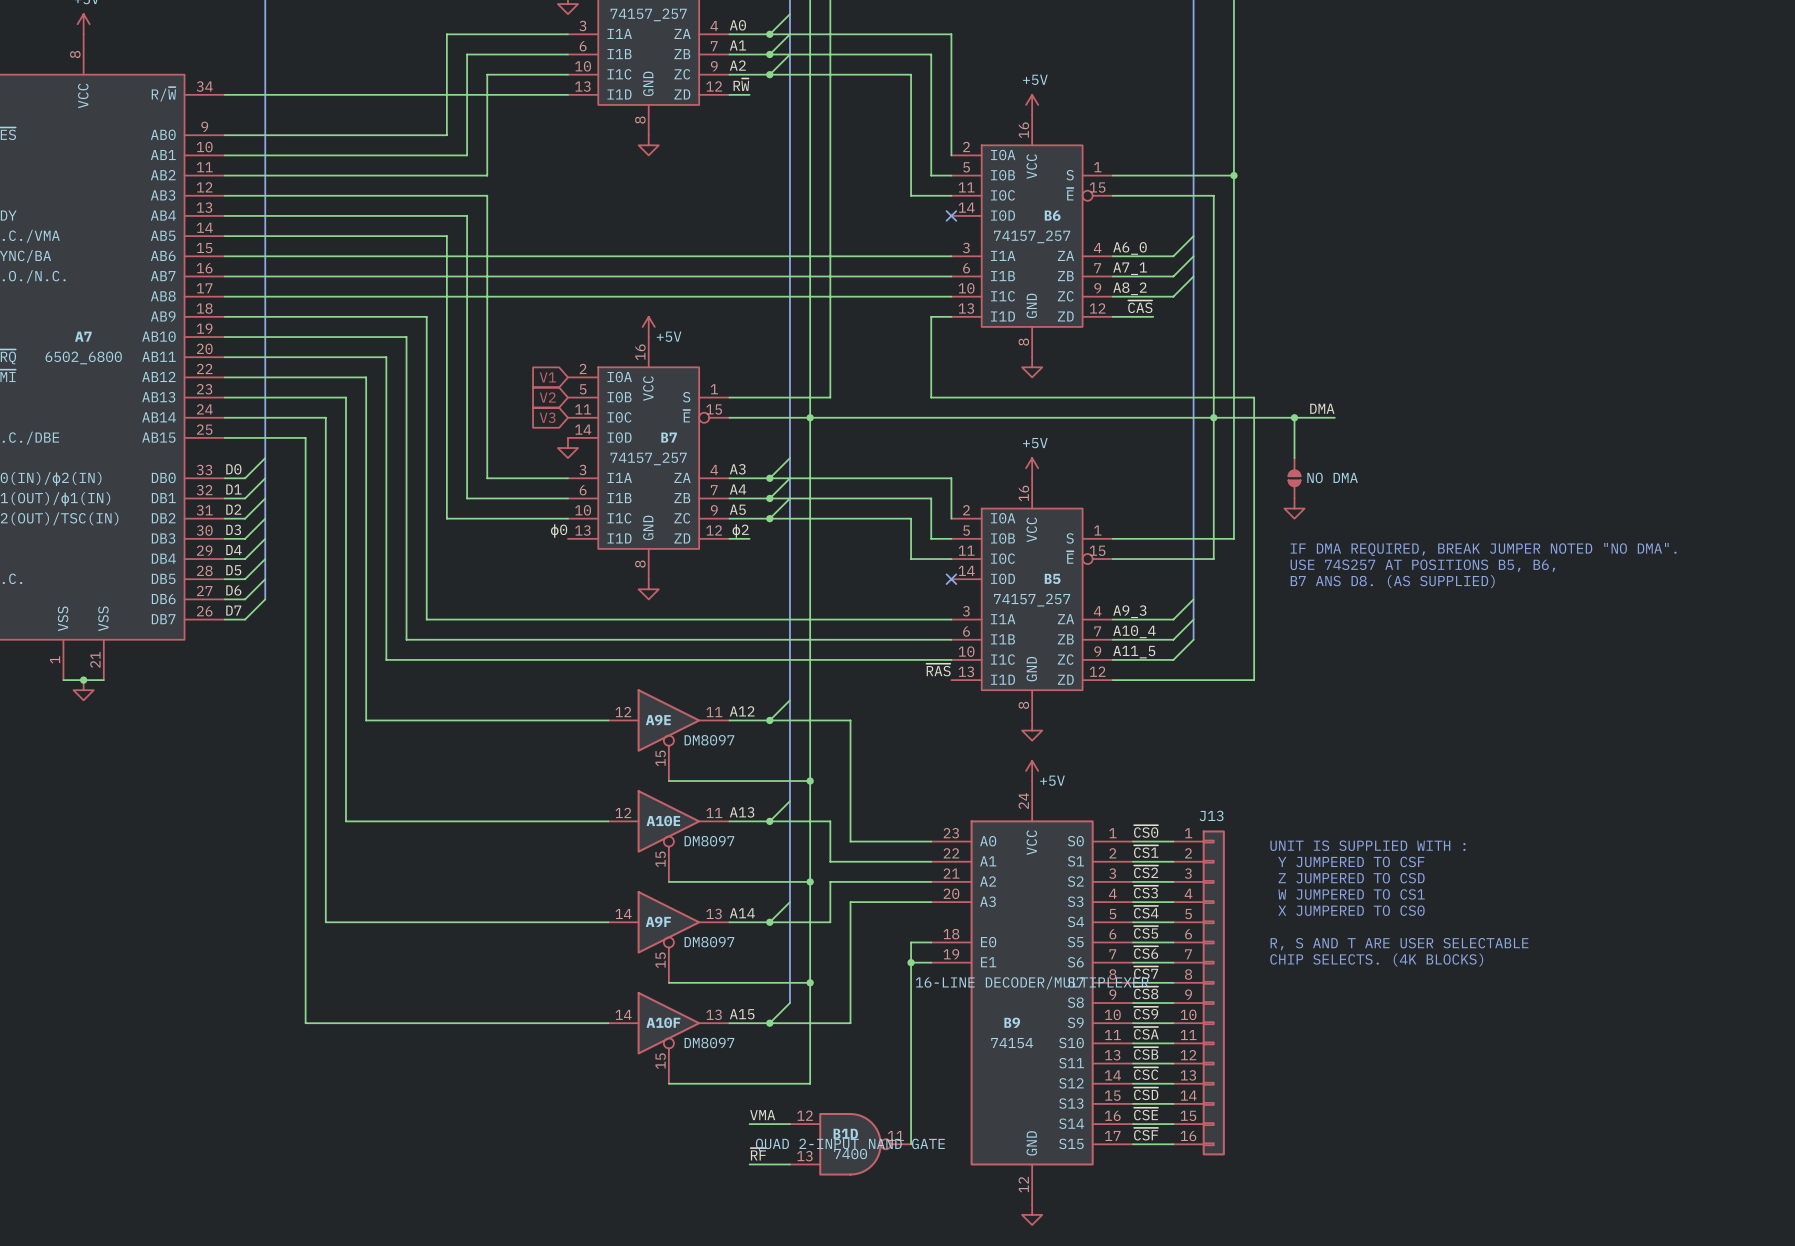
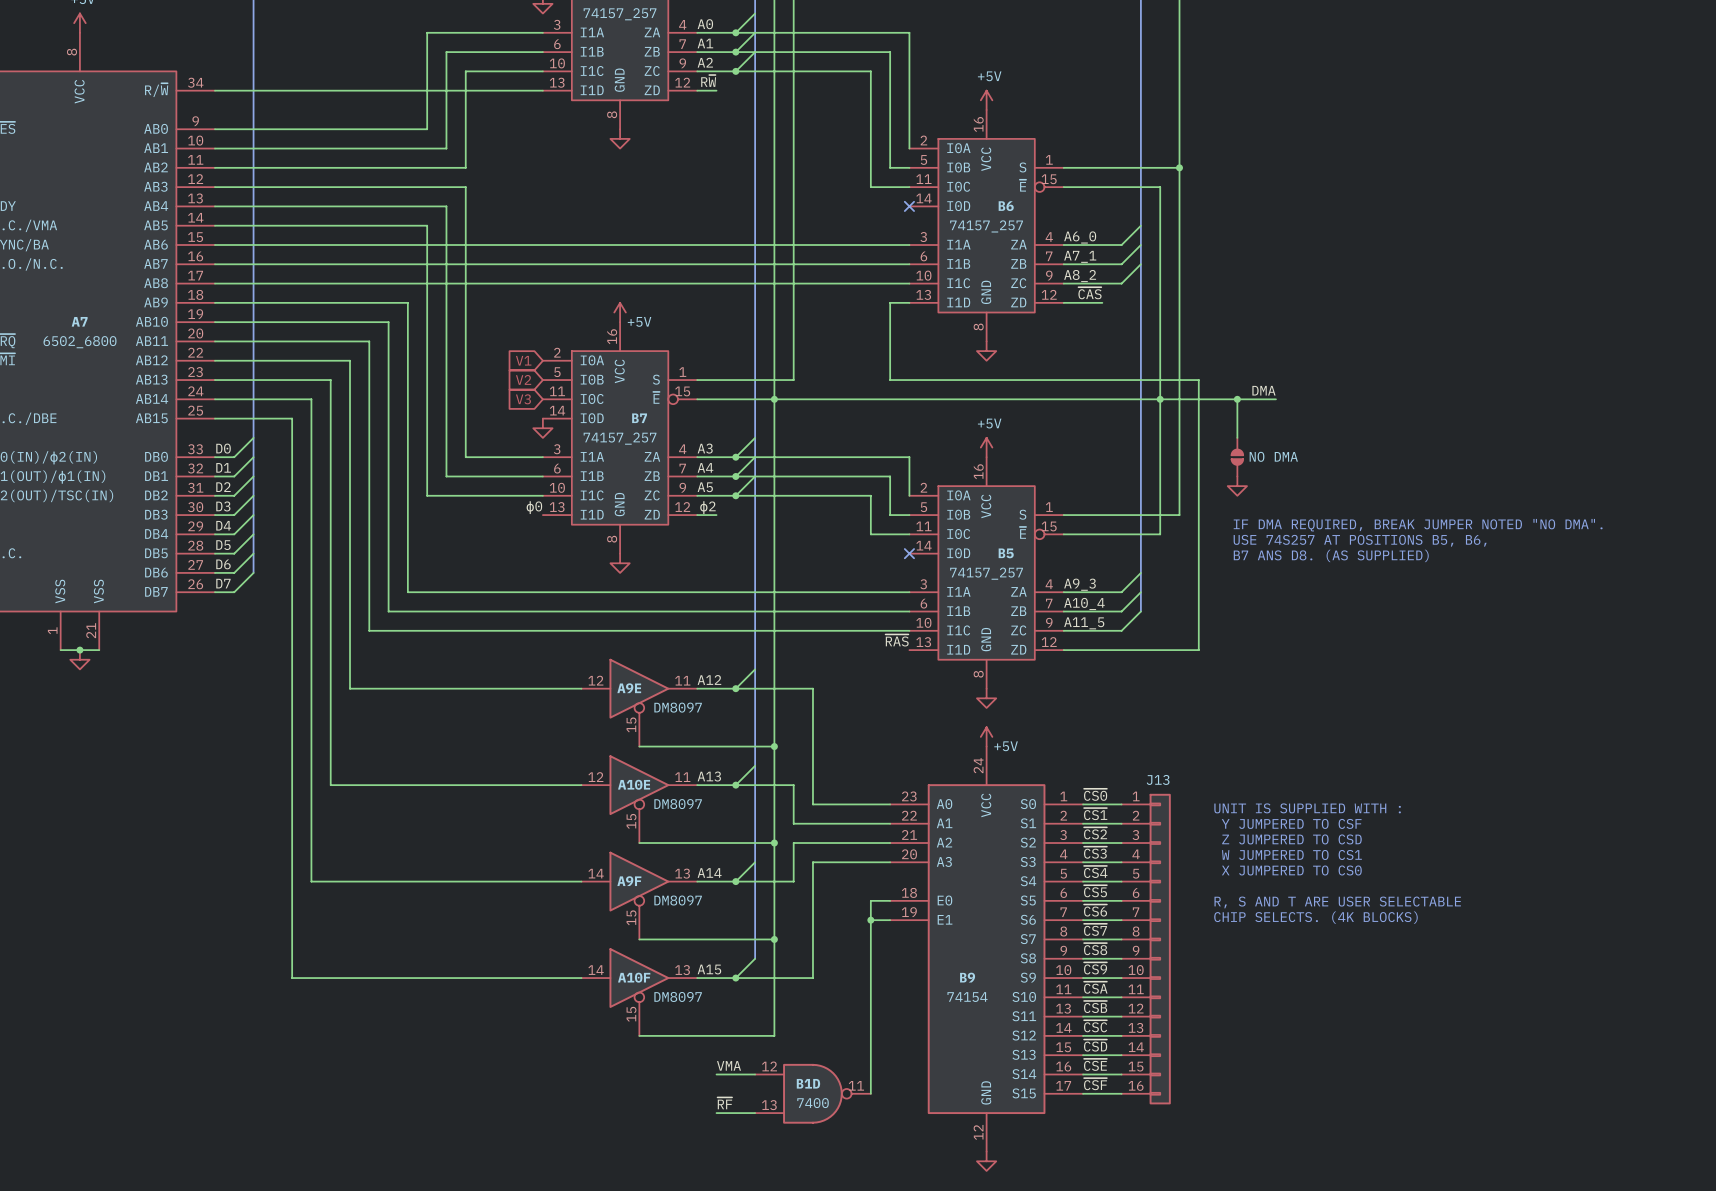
B9 text: 16-LINE DECODER/MULTIPLEXER (1032, 983) -> none
B1D text: QUAD 2-INPUT NAND GATE (850, 1145) -> none

